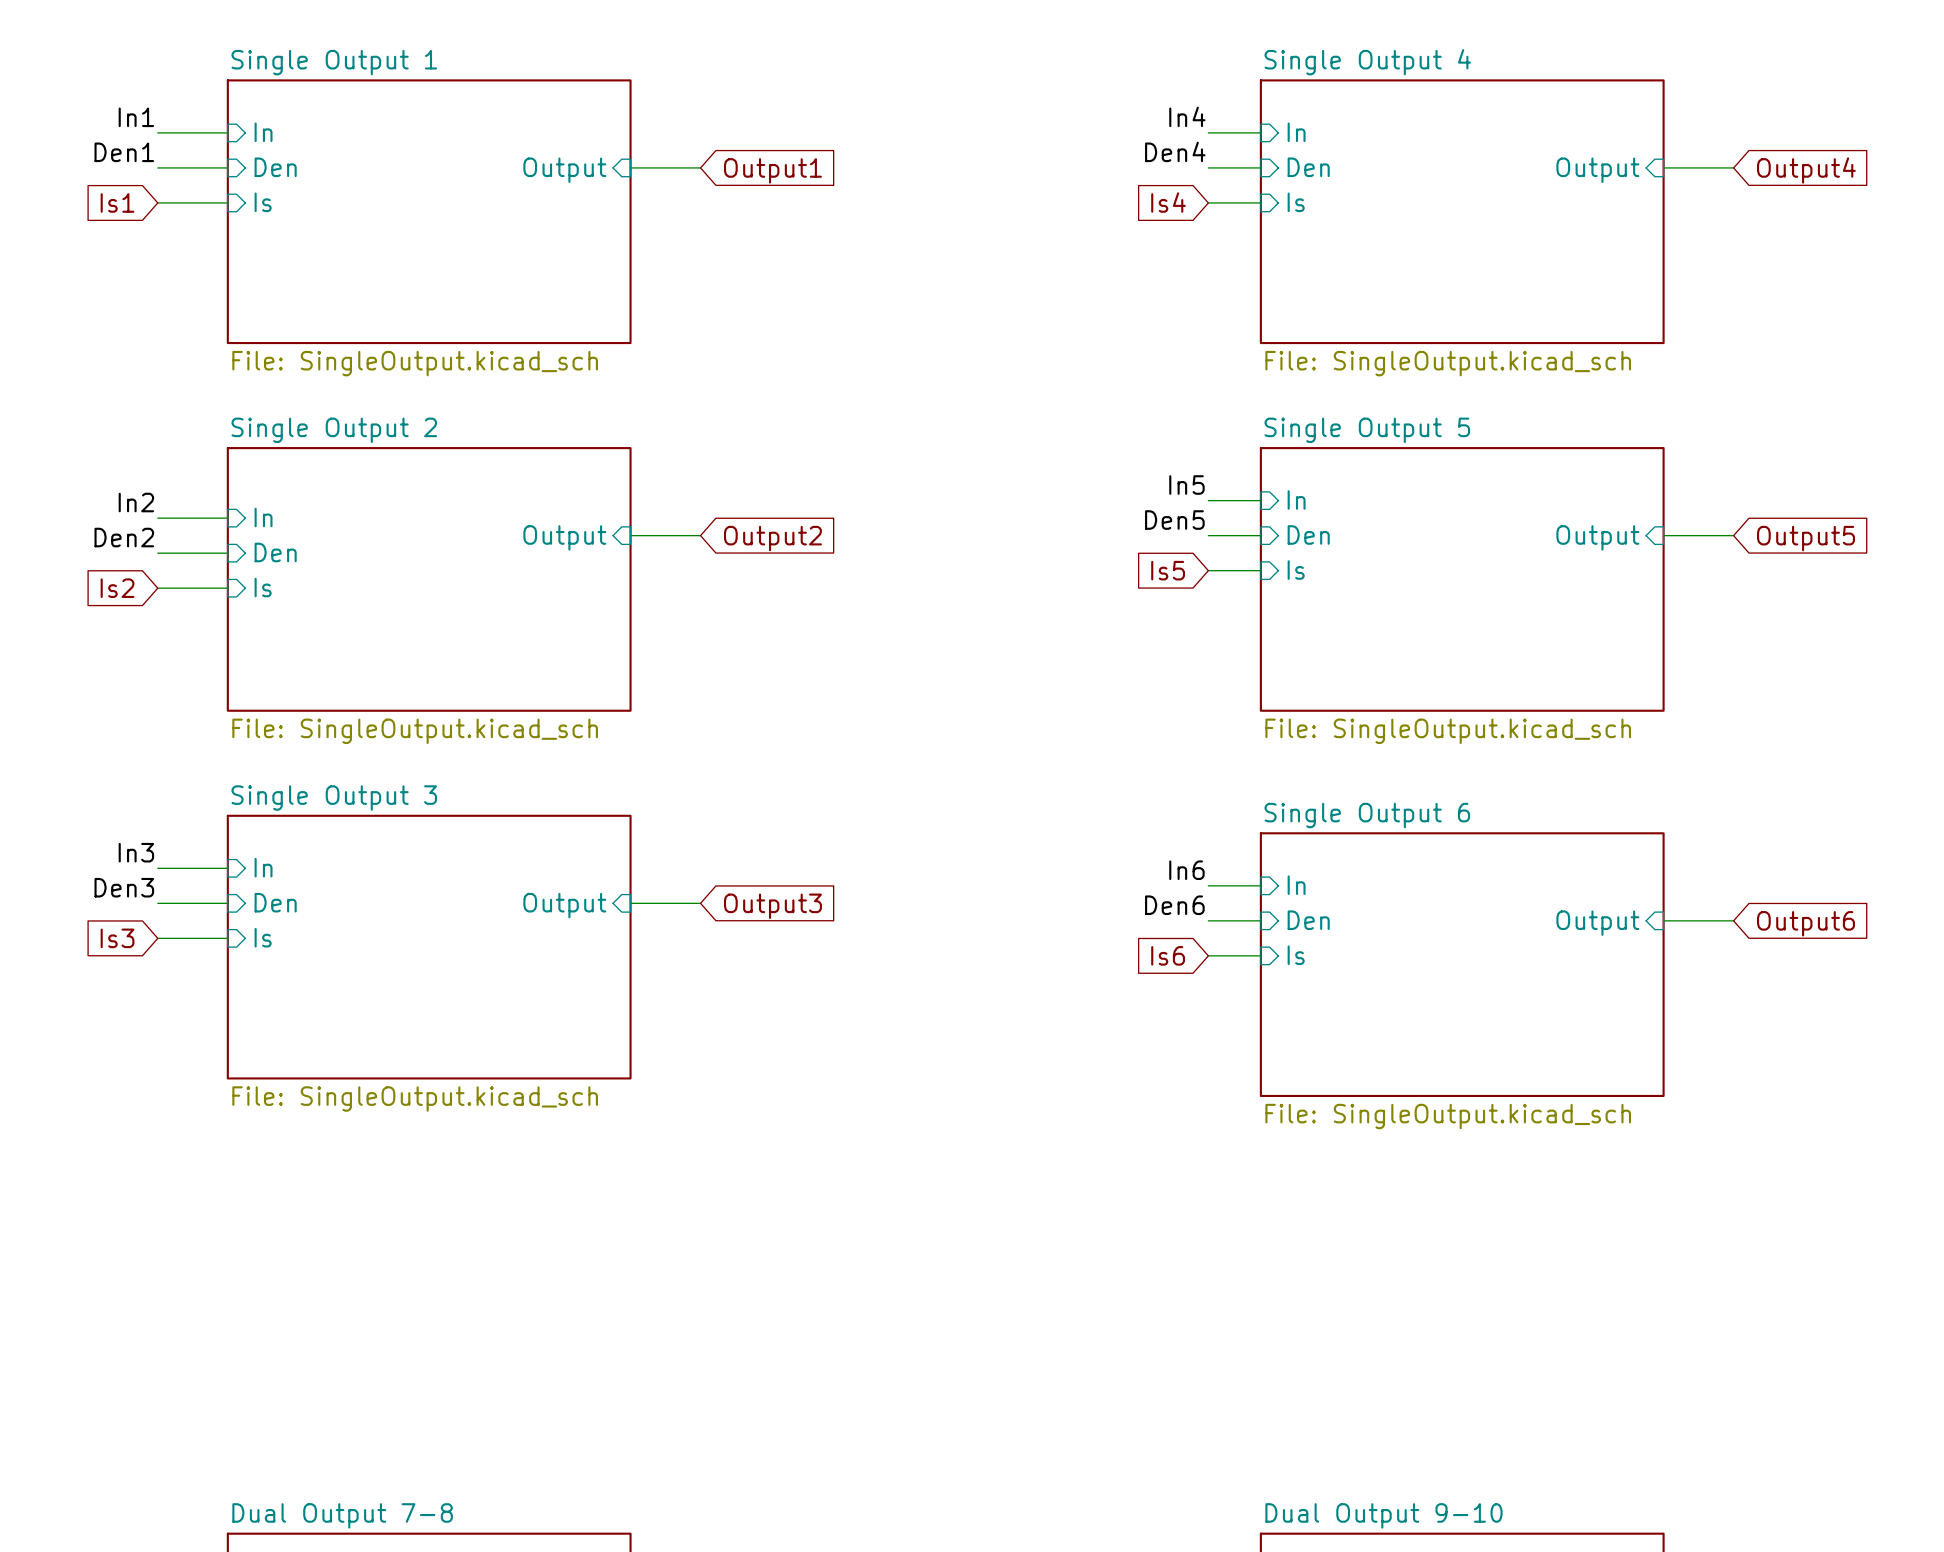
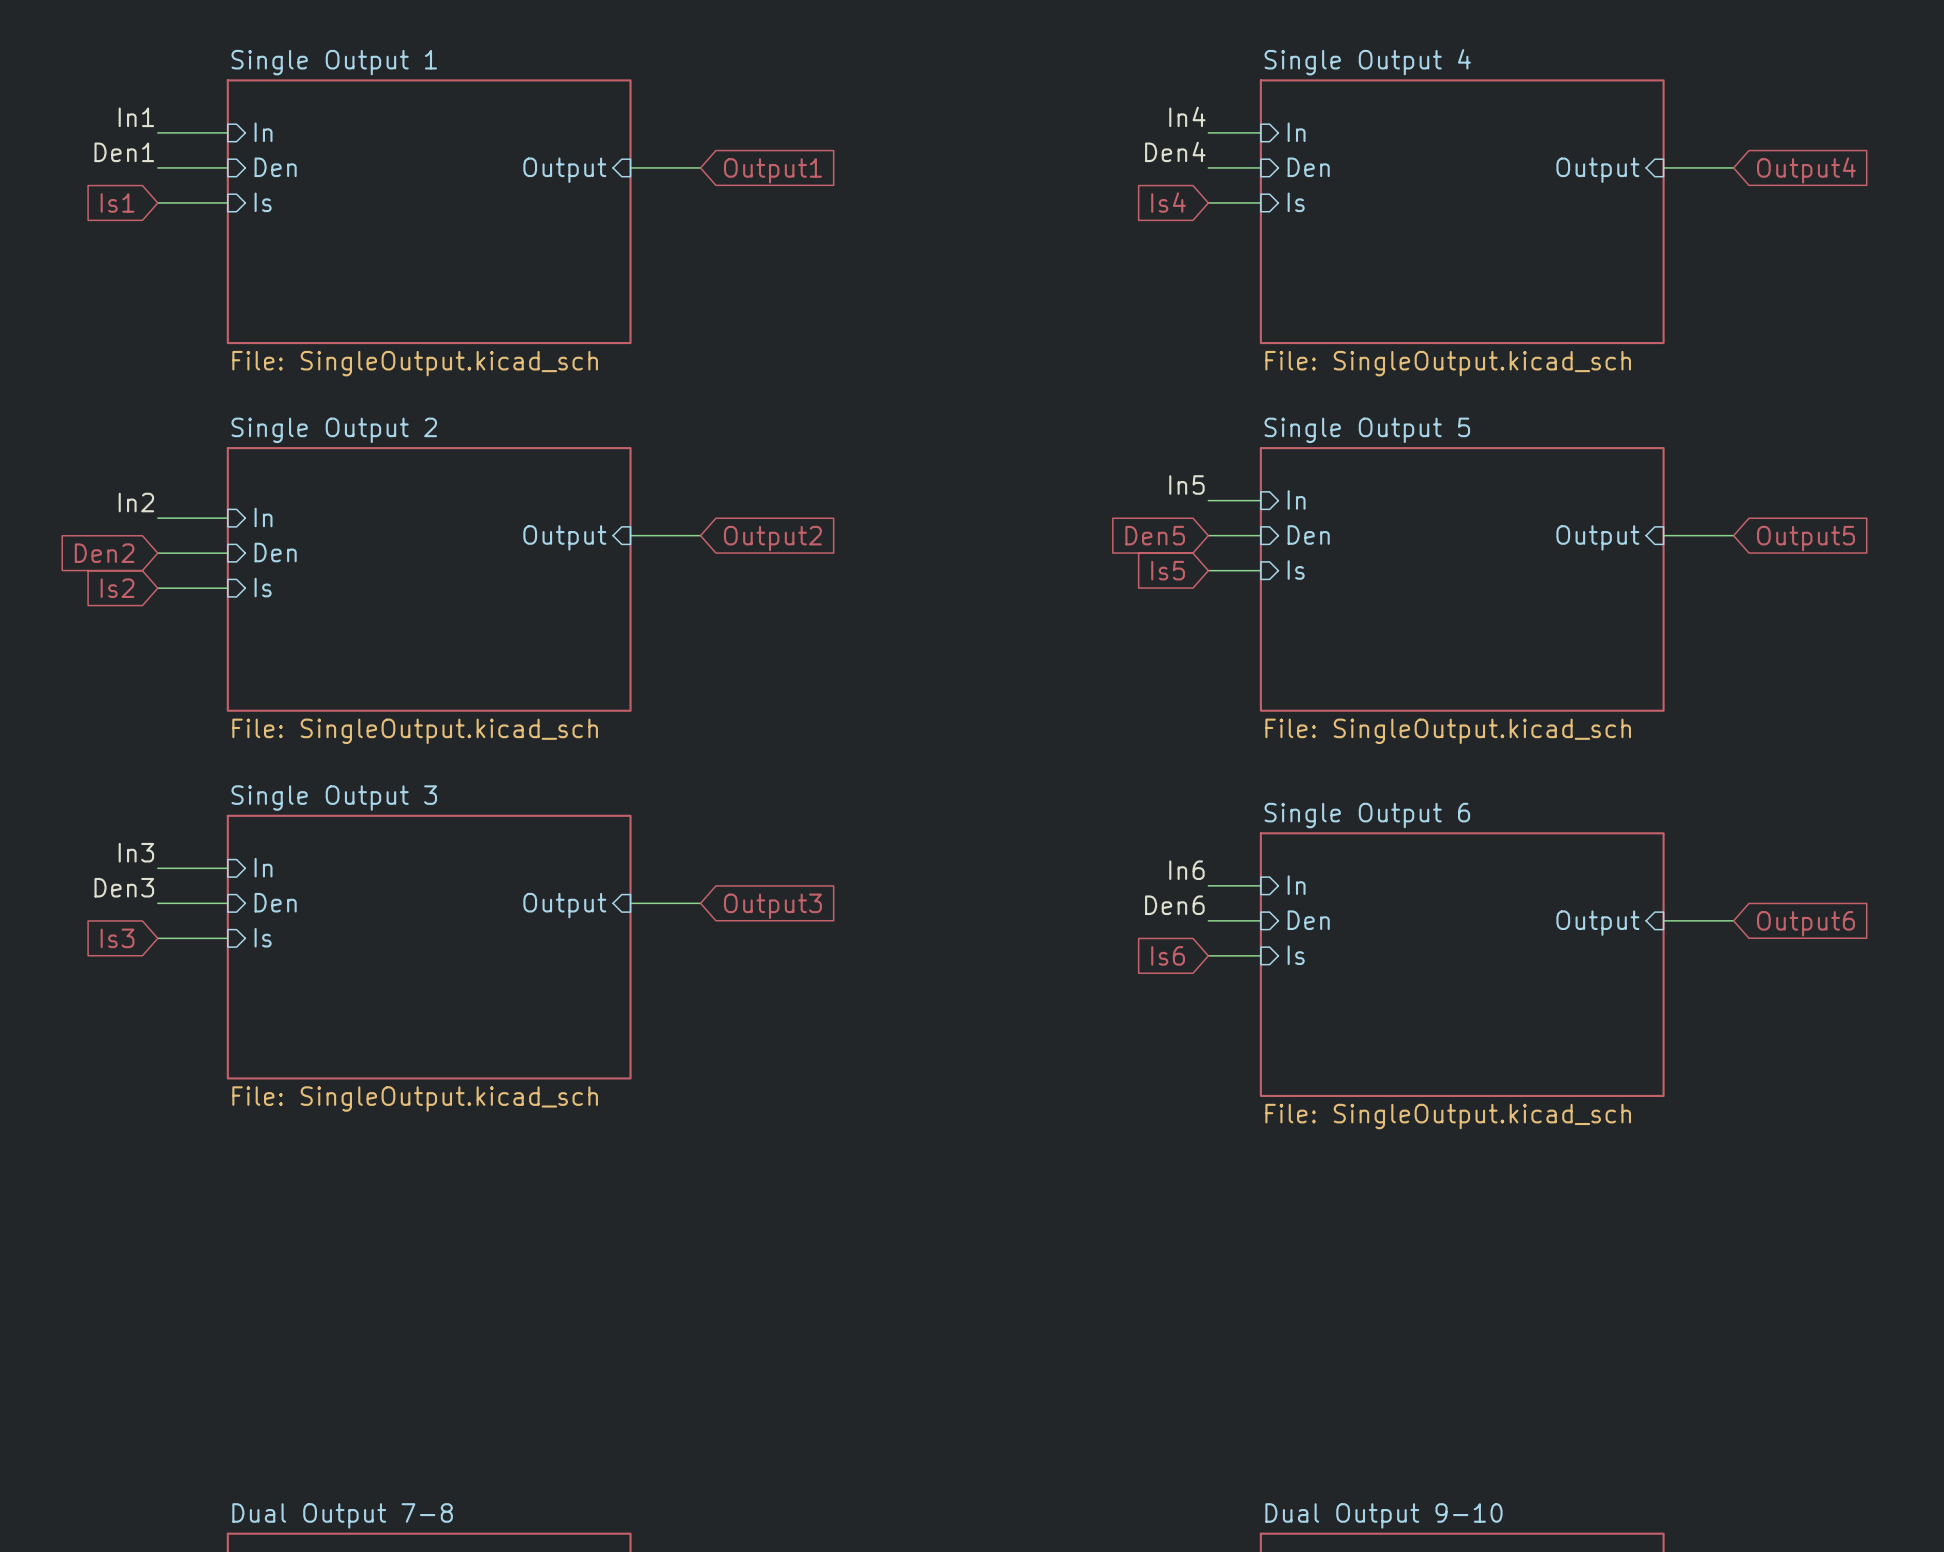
label: Den5 (1174, 520) -> none
global label: none -> Den5 (1155, 535)
label: Den2 (124, 537) -> none
global label: none -> Den2 (104, 553)

